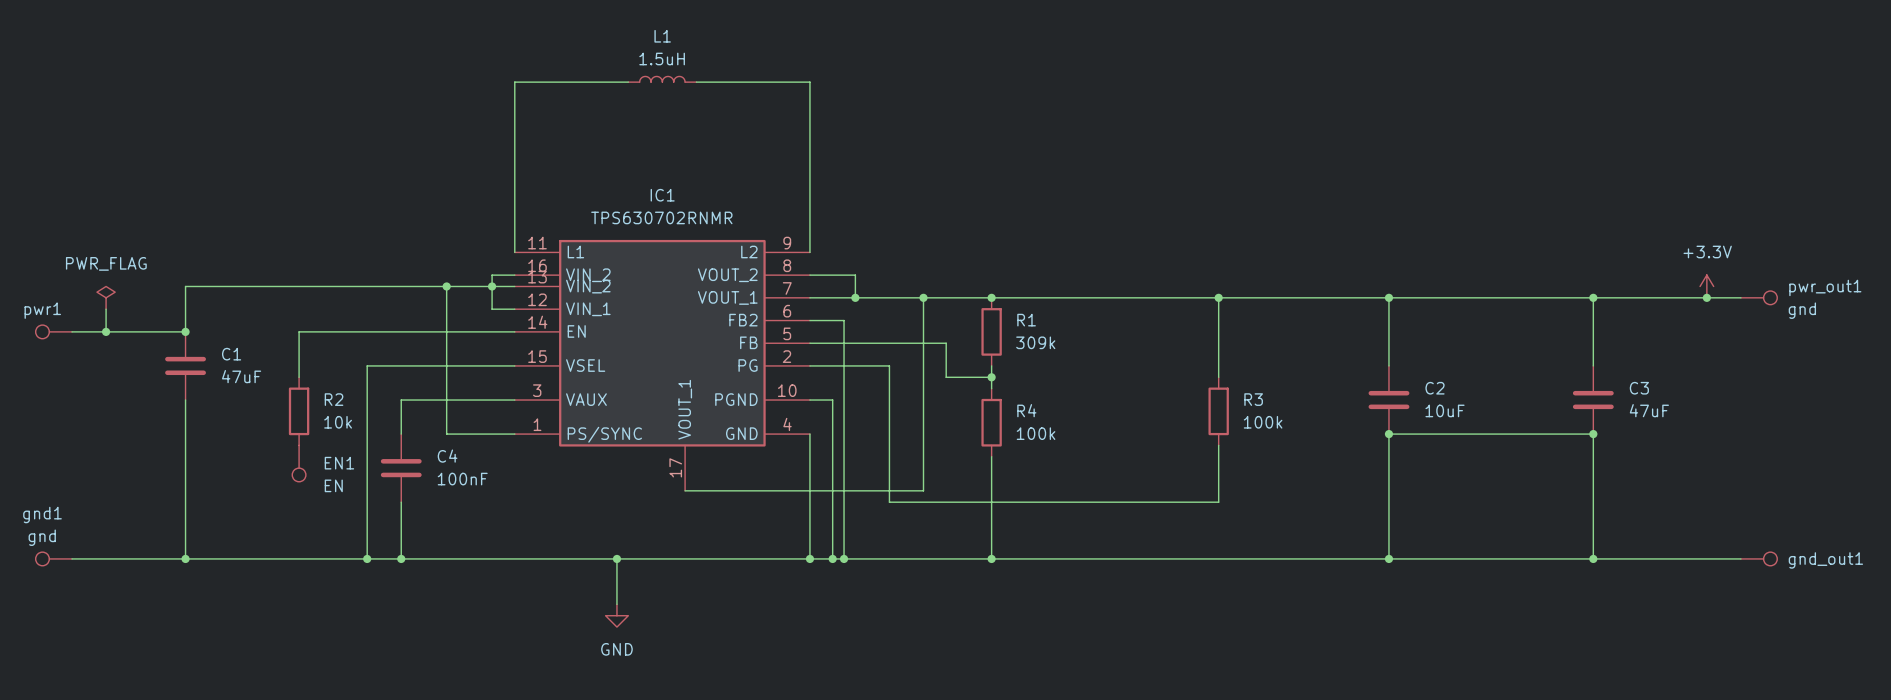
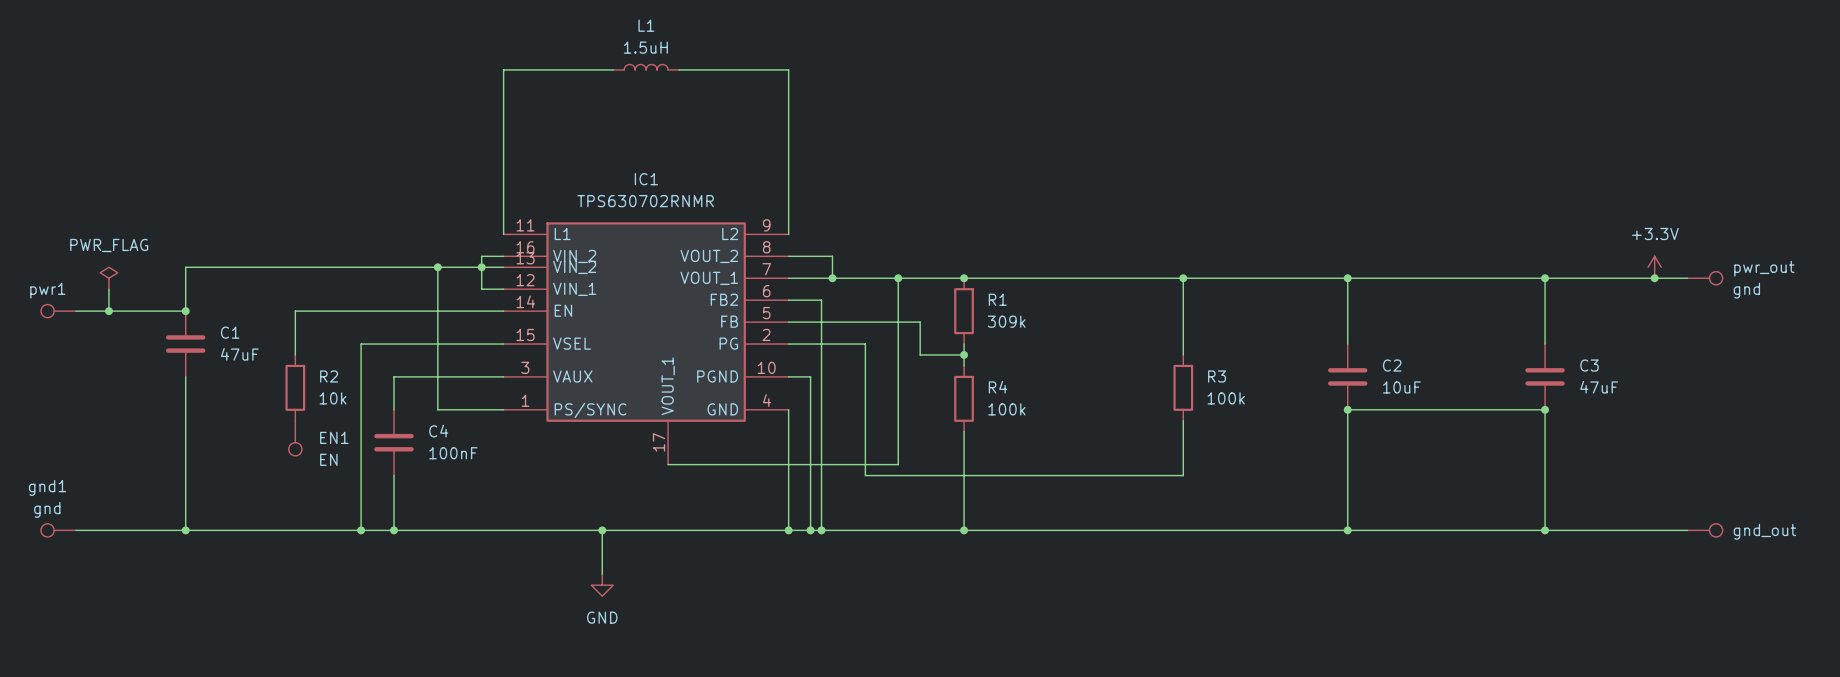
pwr_out1 name: pwr_out1 (1825, 287) -> pwr_out (1764, 268)
gnd_out1 name: gnd_out1 (1825, 560) -> gnd_out (1764, 531)

